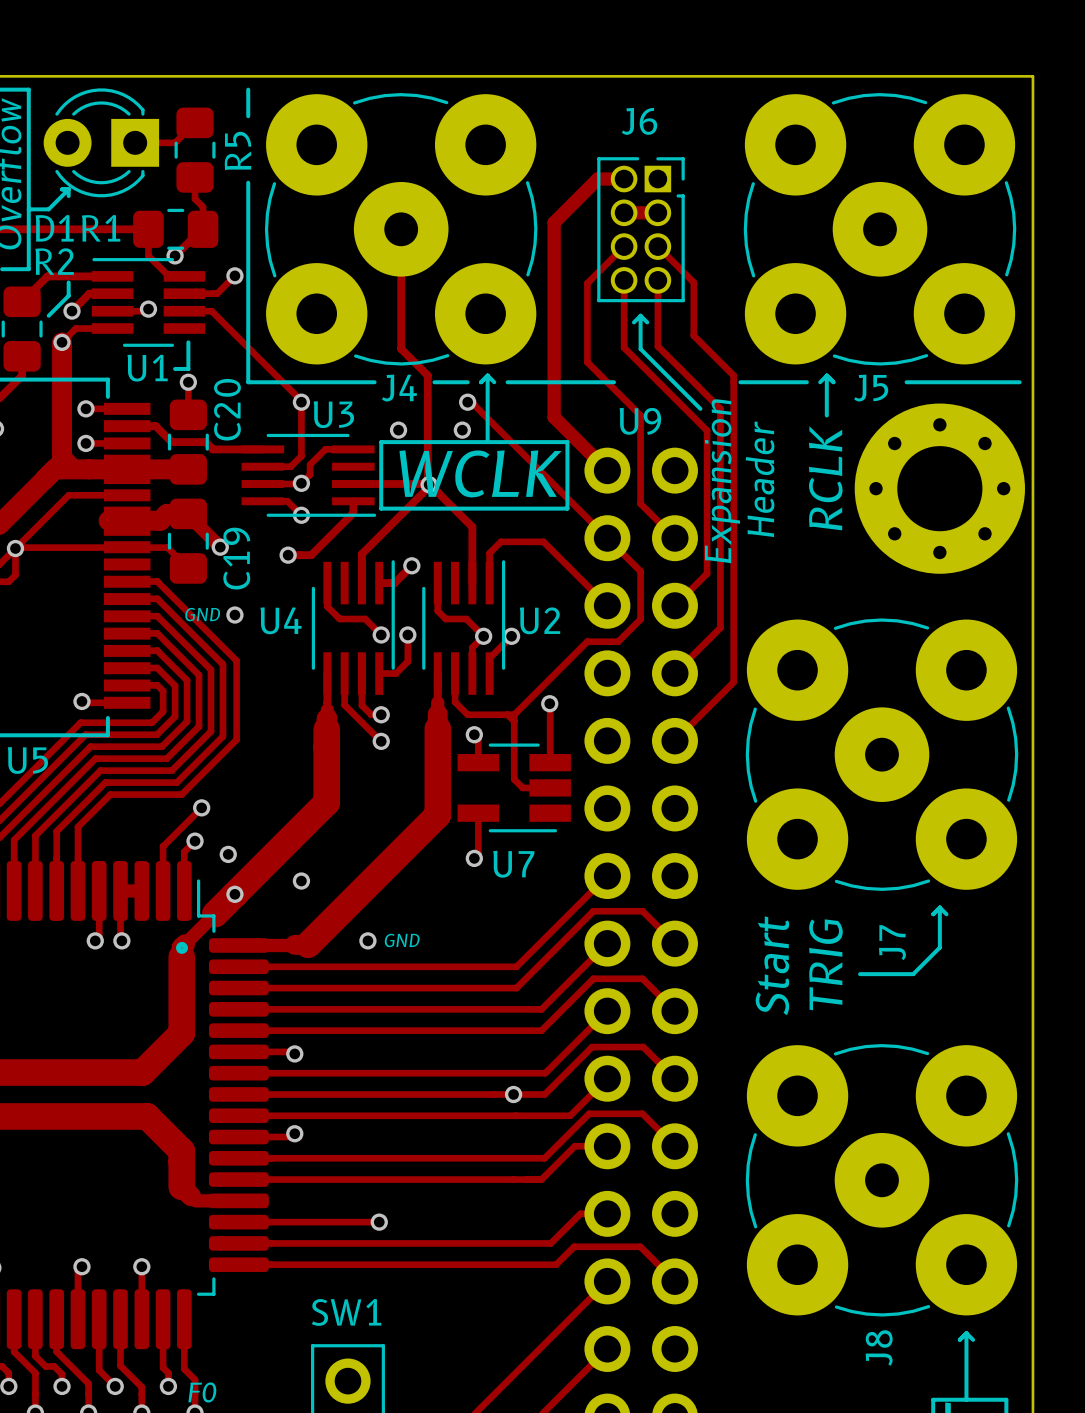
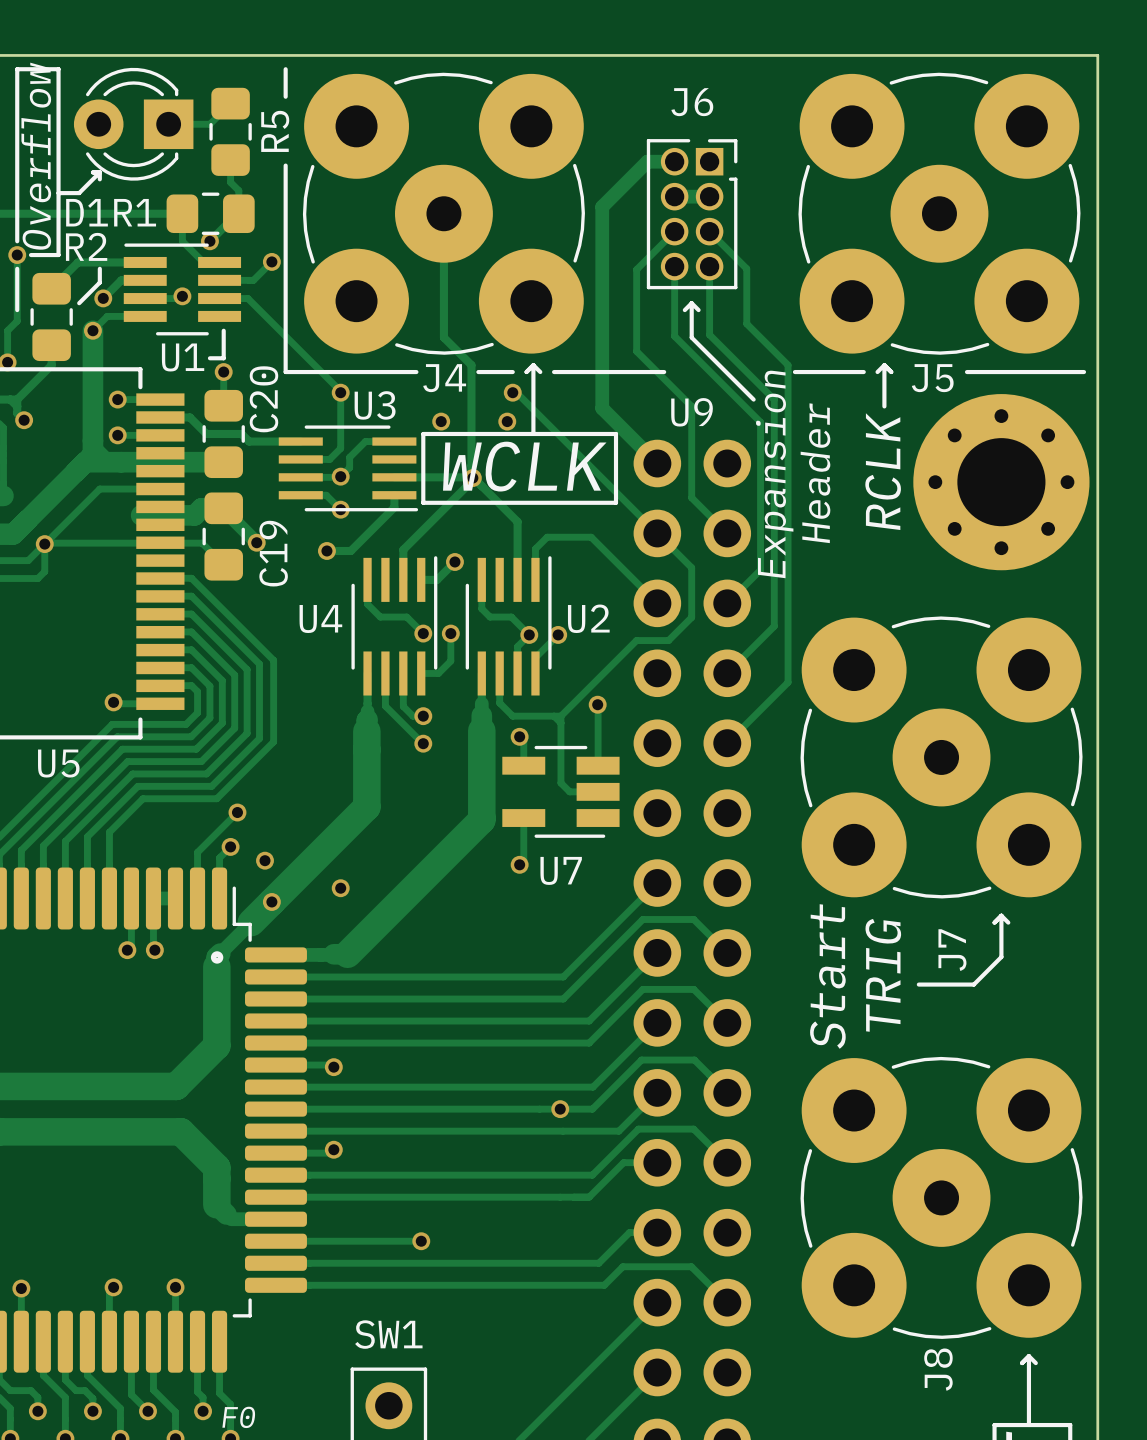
text: GND (202, 614) -> none
via: (234, 615) -> none
via: (367, 940) -> none
text: GND (402, 940) -> none

